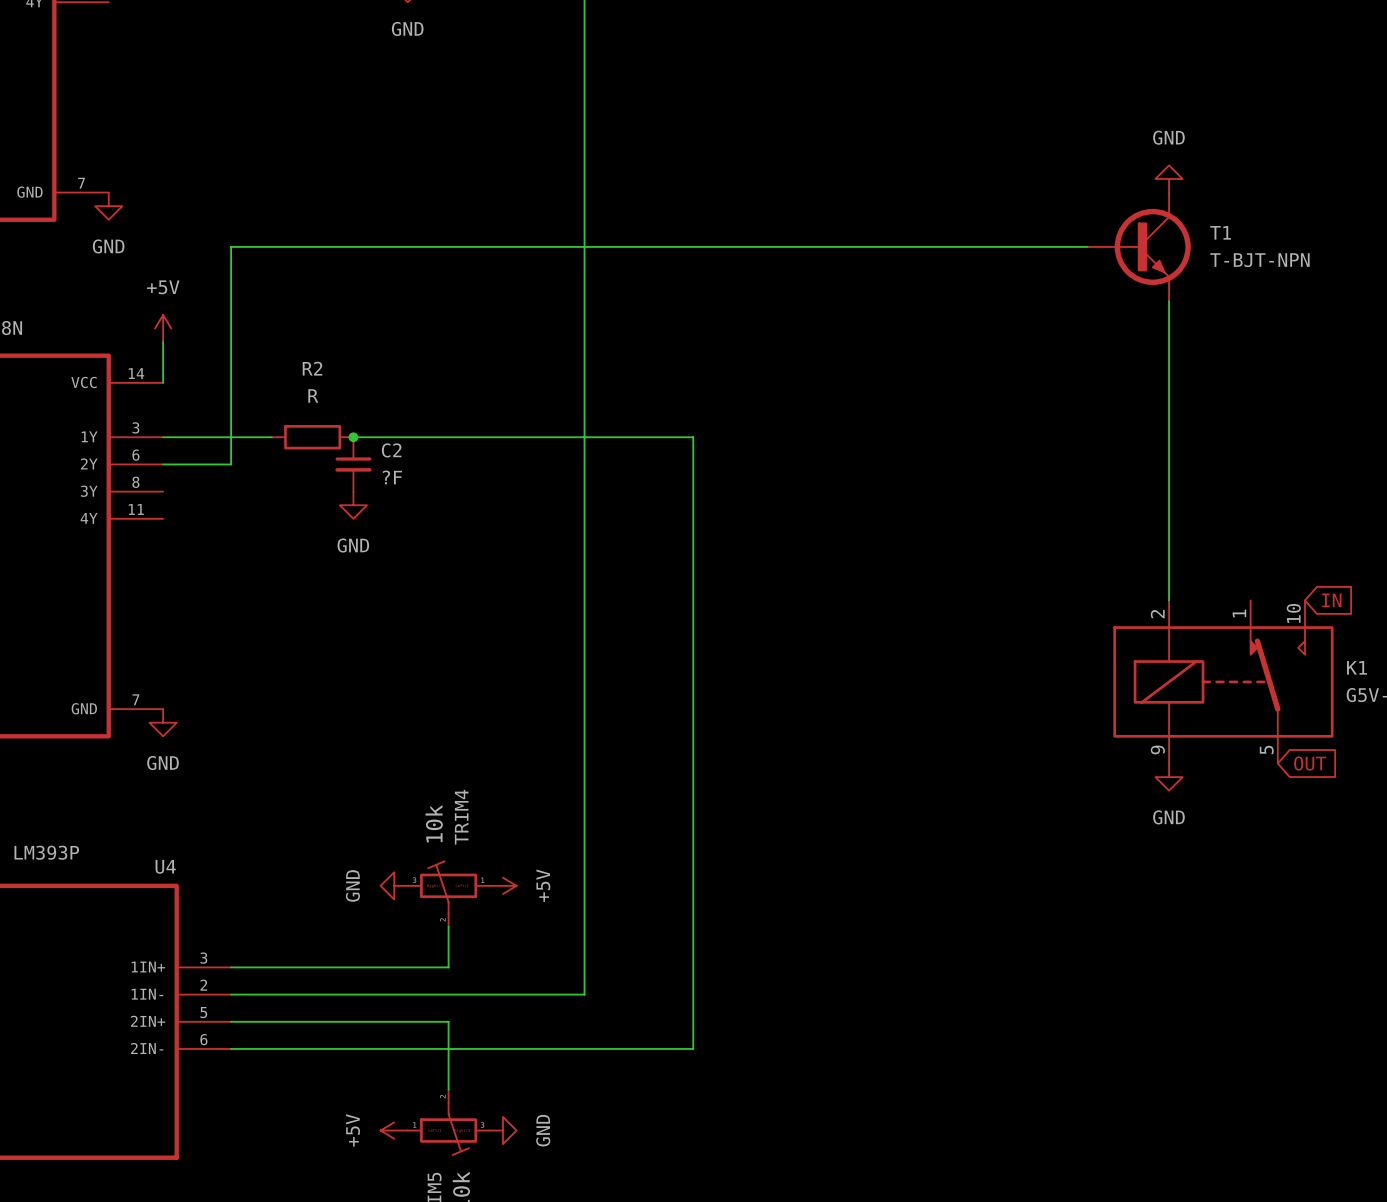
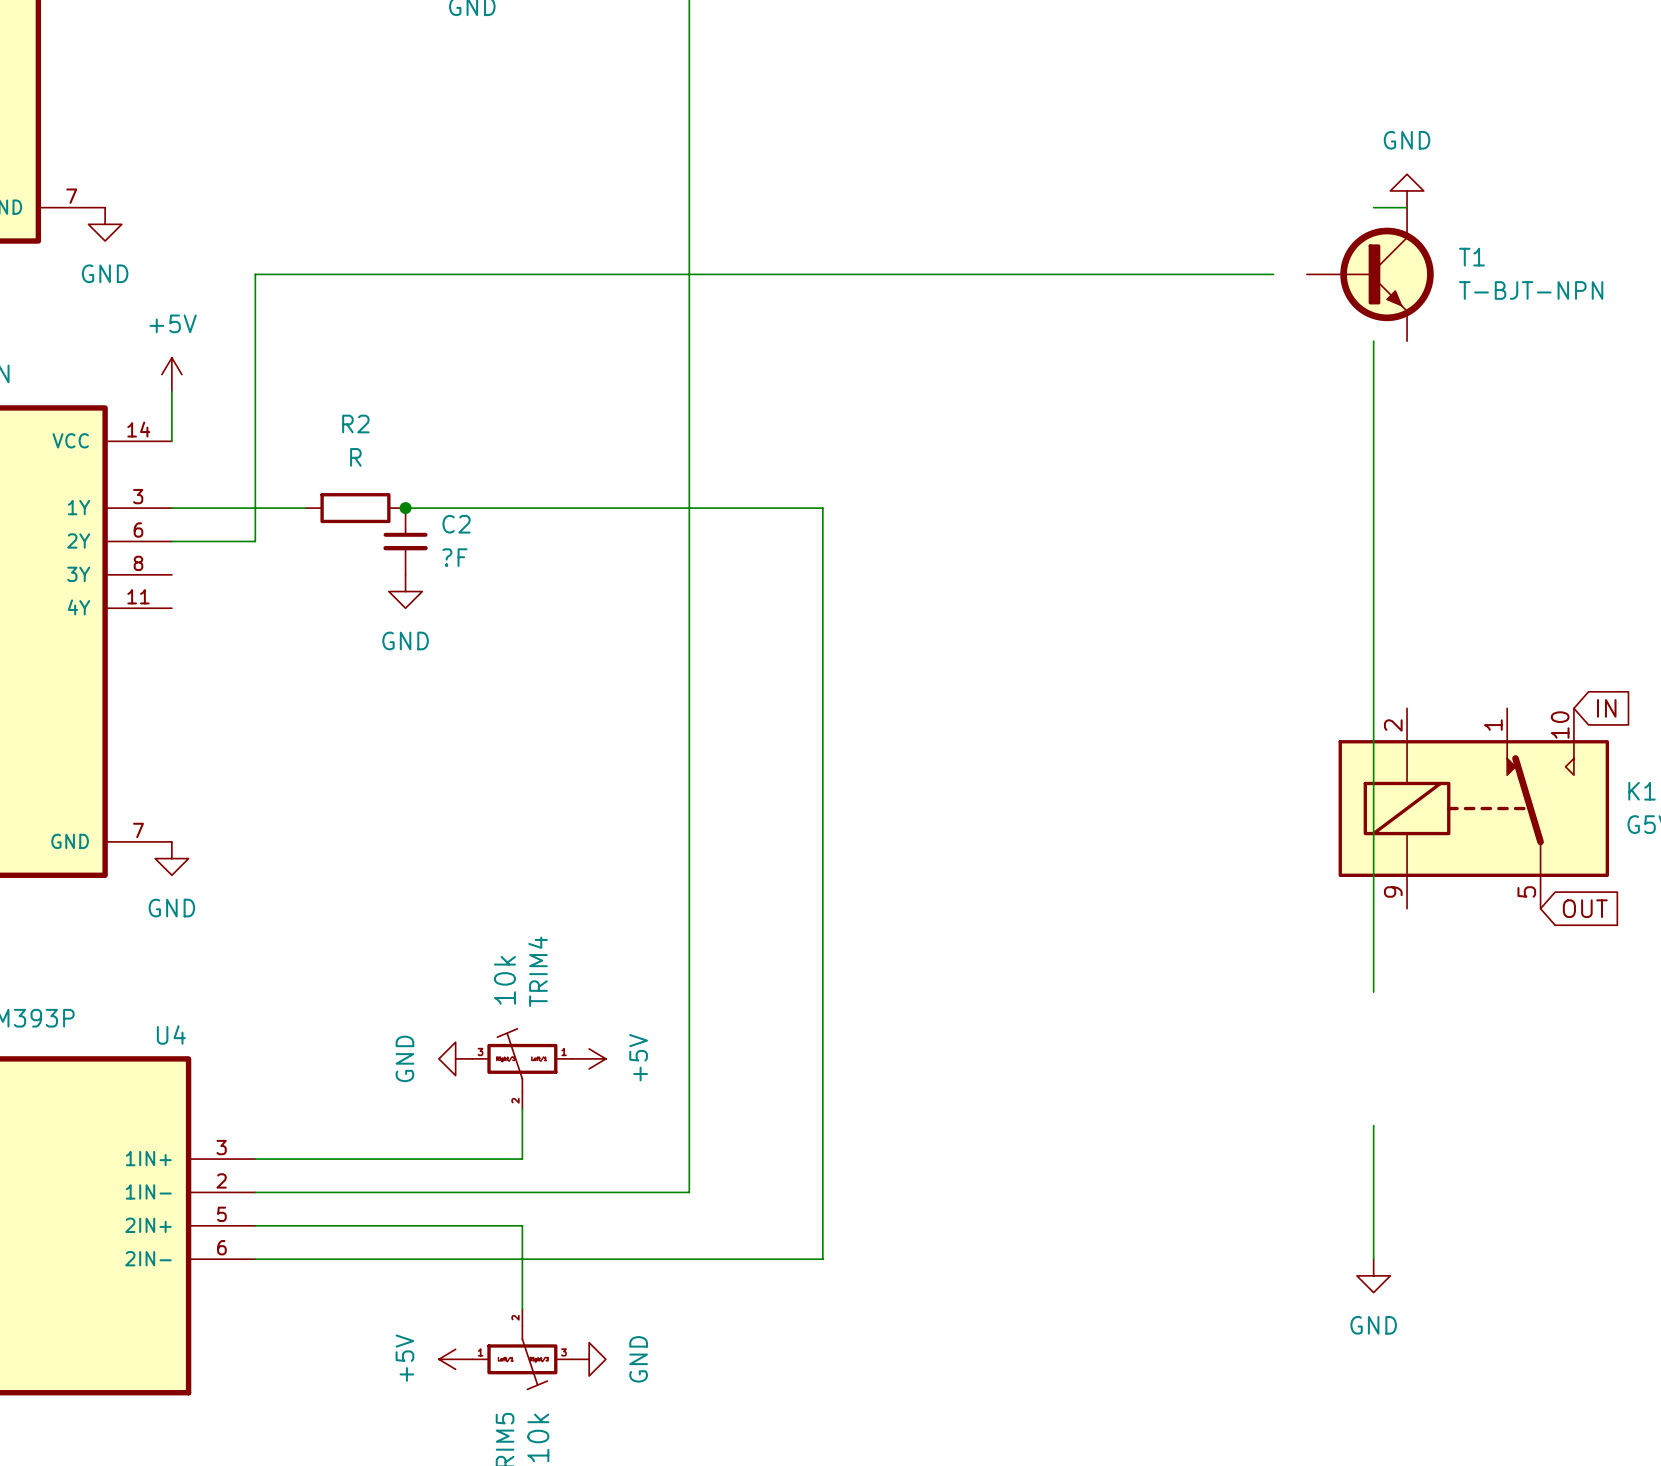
wire: (1060, 246) (1087, 246) -> (1373, 207) (1407, 207)
wire: none -> (1373, 341) (1373, 992)
wire: (1169, 301) (1169, 600) -> none
power symbol: GND (1169, 777) -> none
wire: none -> (1373, 1125) (1373, 1259)
power symbol: none -> GND (1373, 1275)

